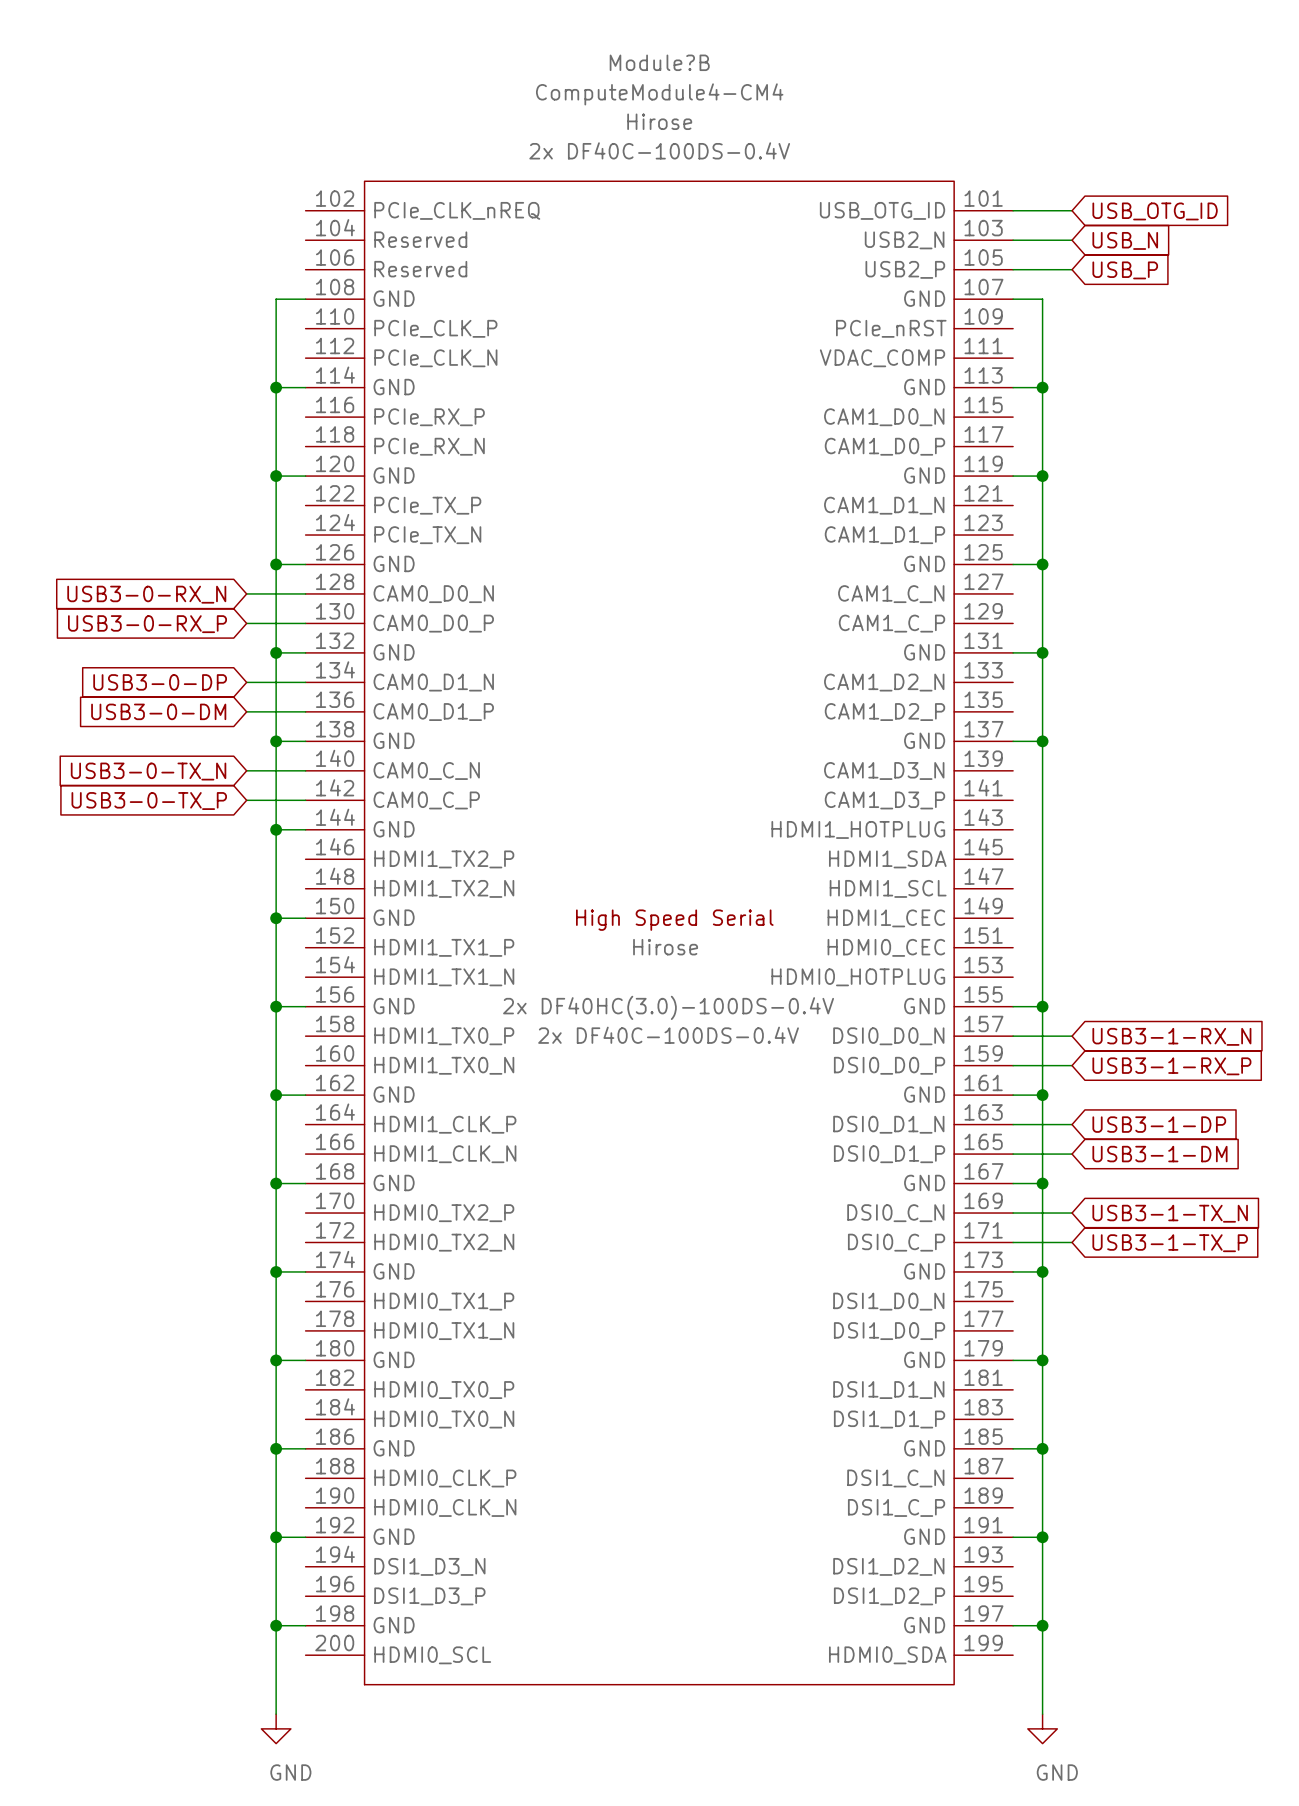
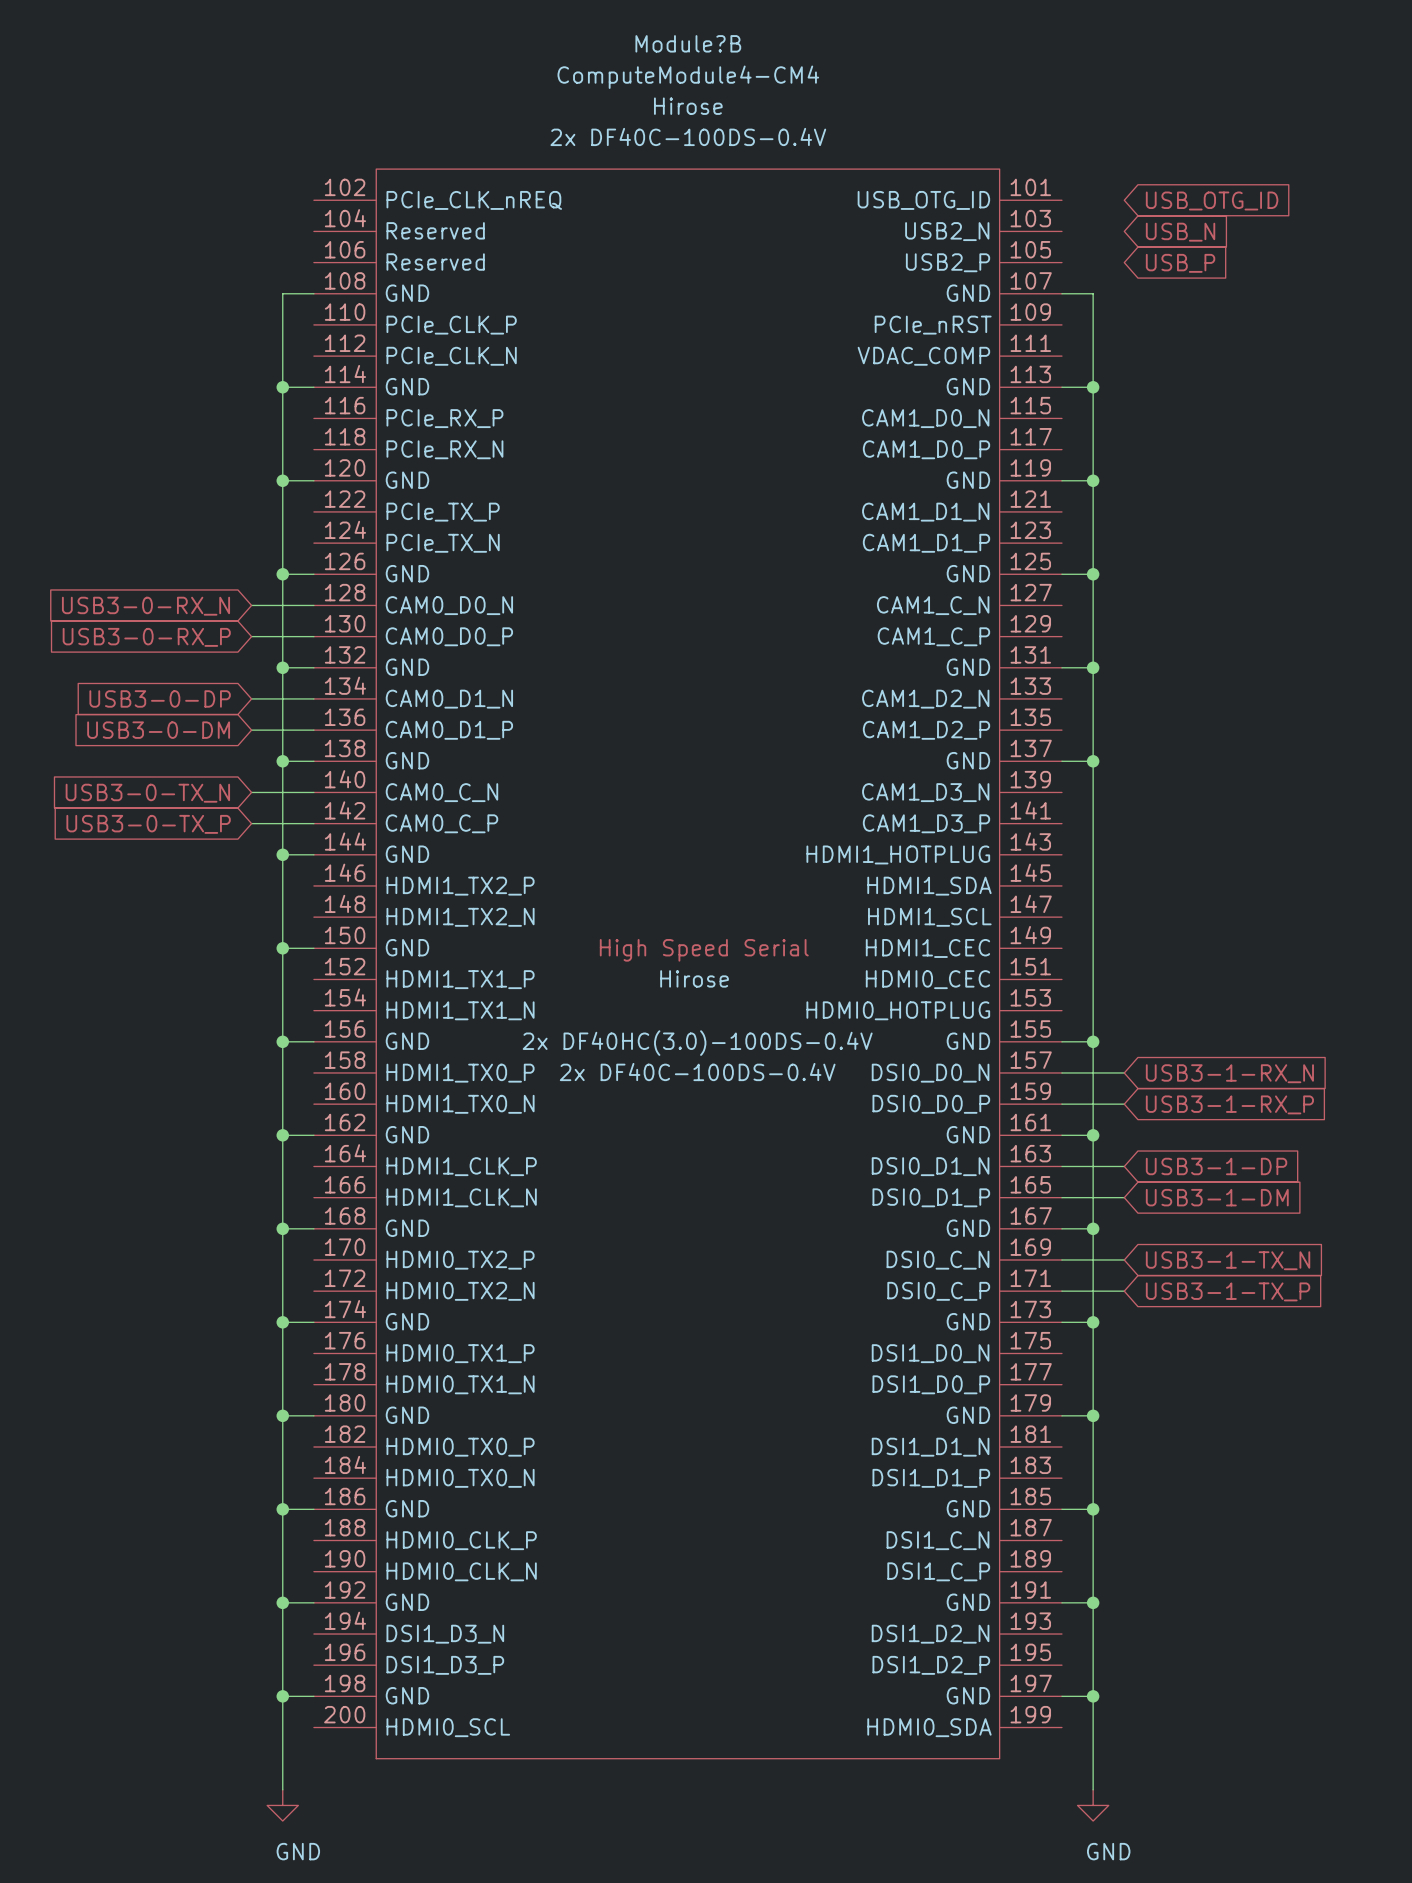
wire: (1013, 210) (1072, 210) -> none
wire: (1013, 240) (1072, 240) -> none
wire: (1013, 269) (1072, 269) -> none

